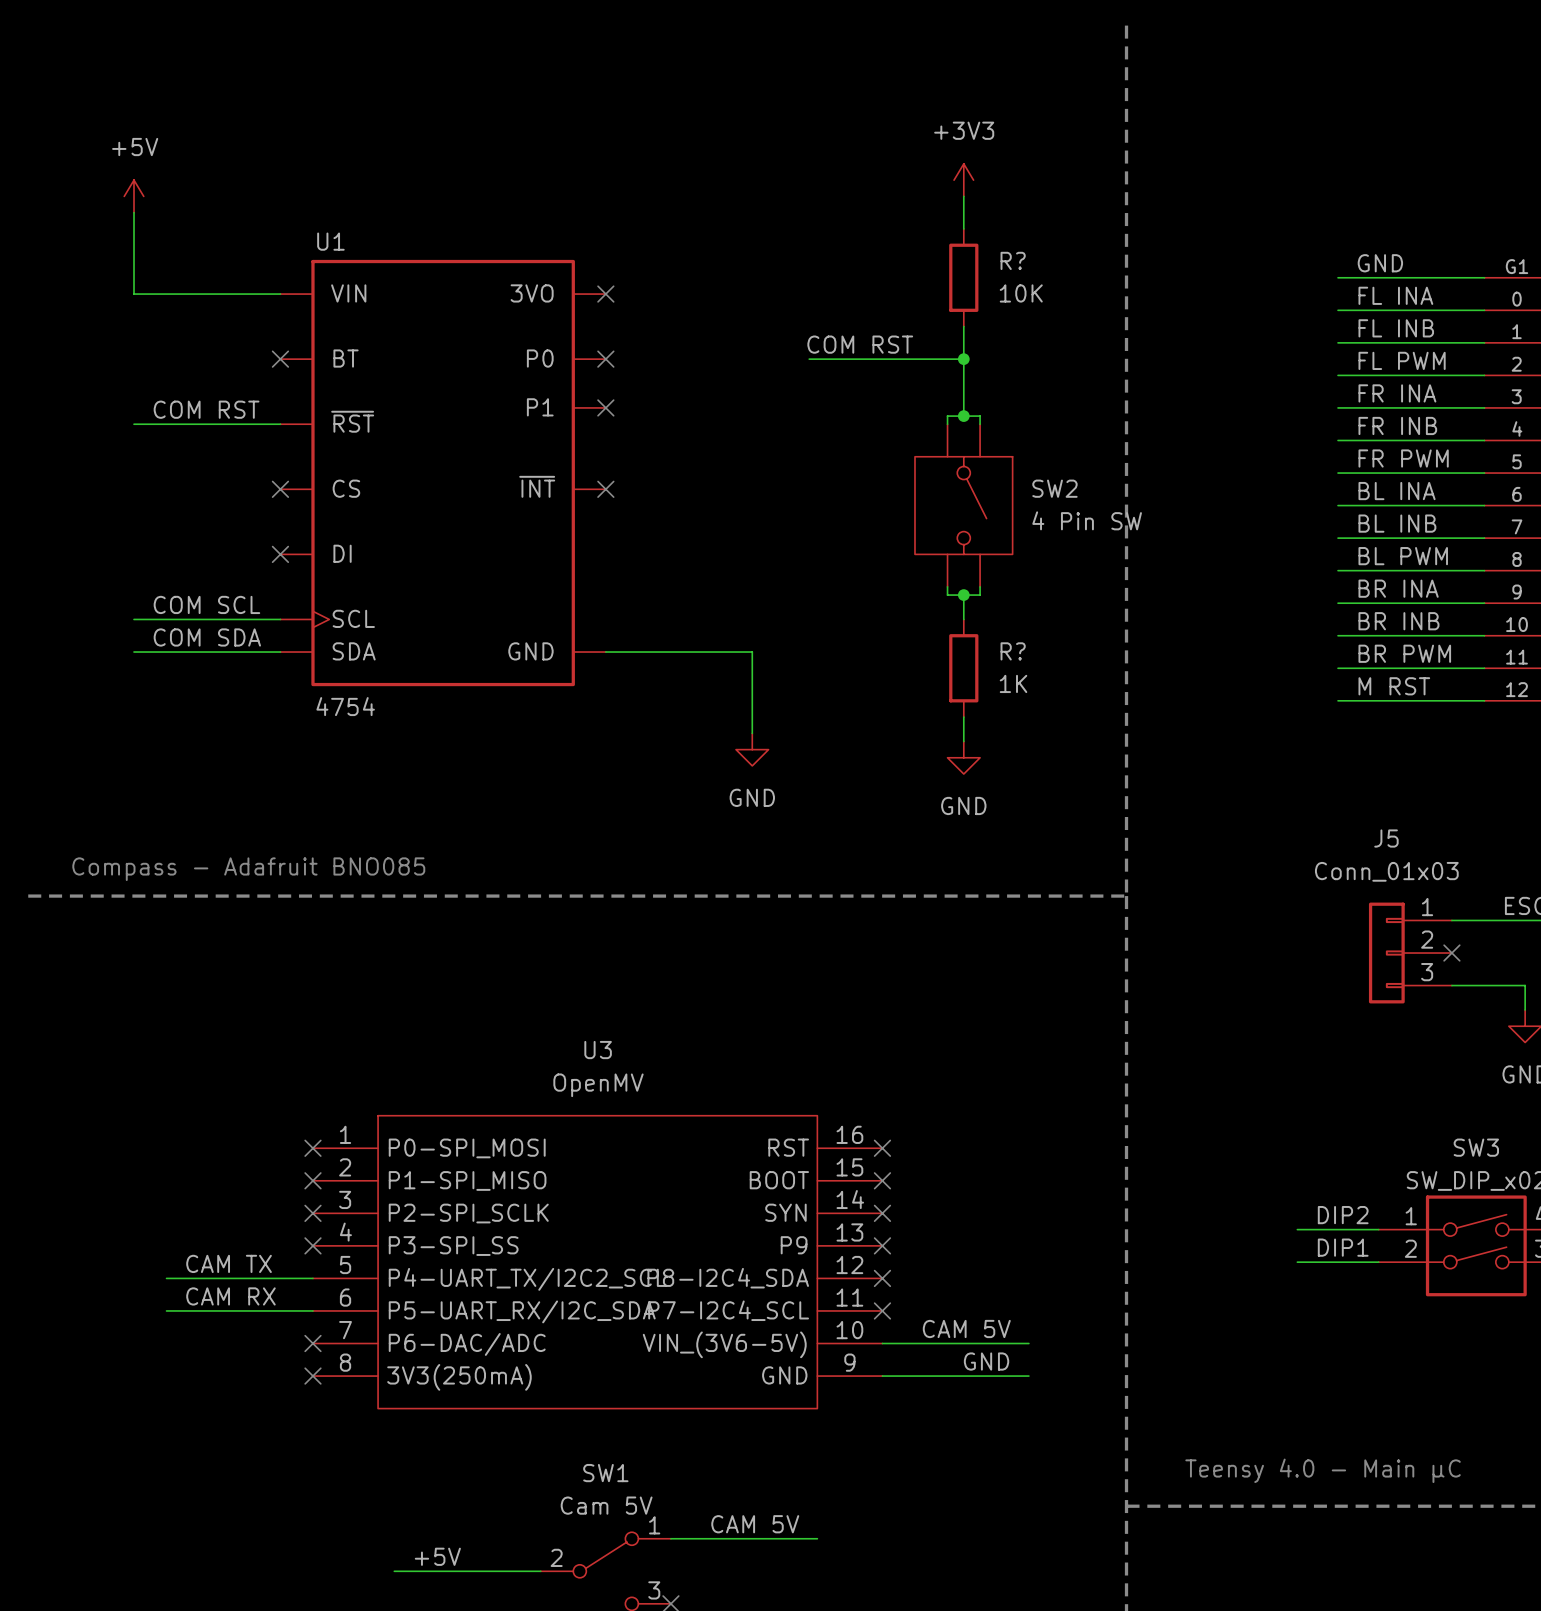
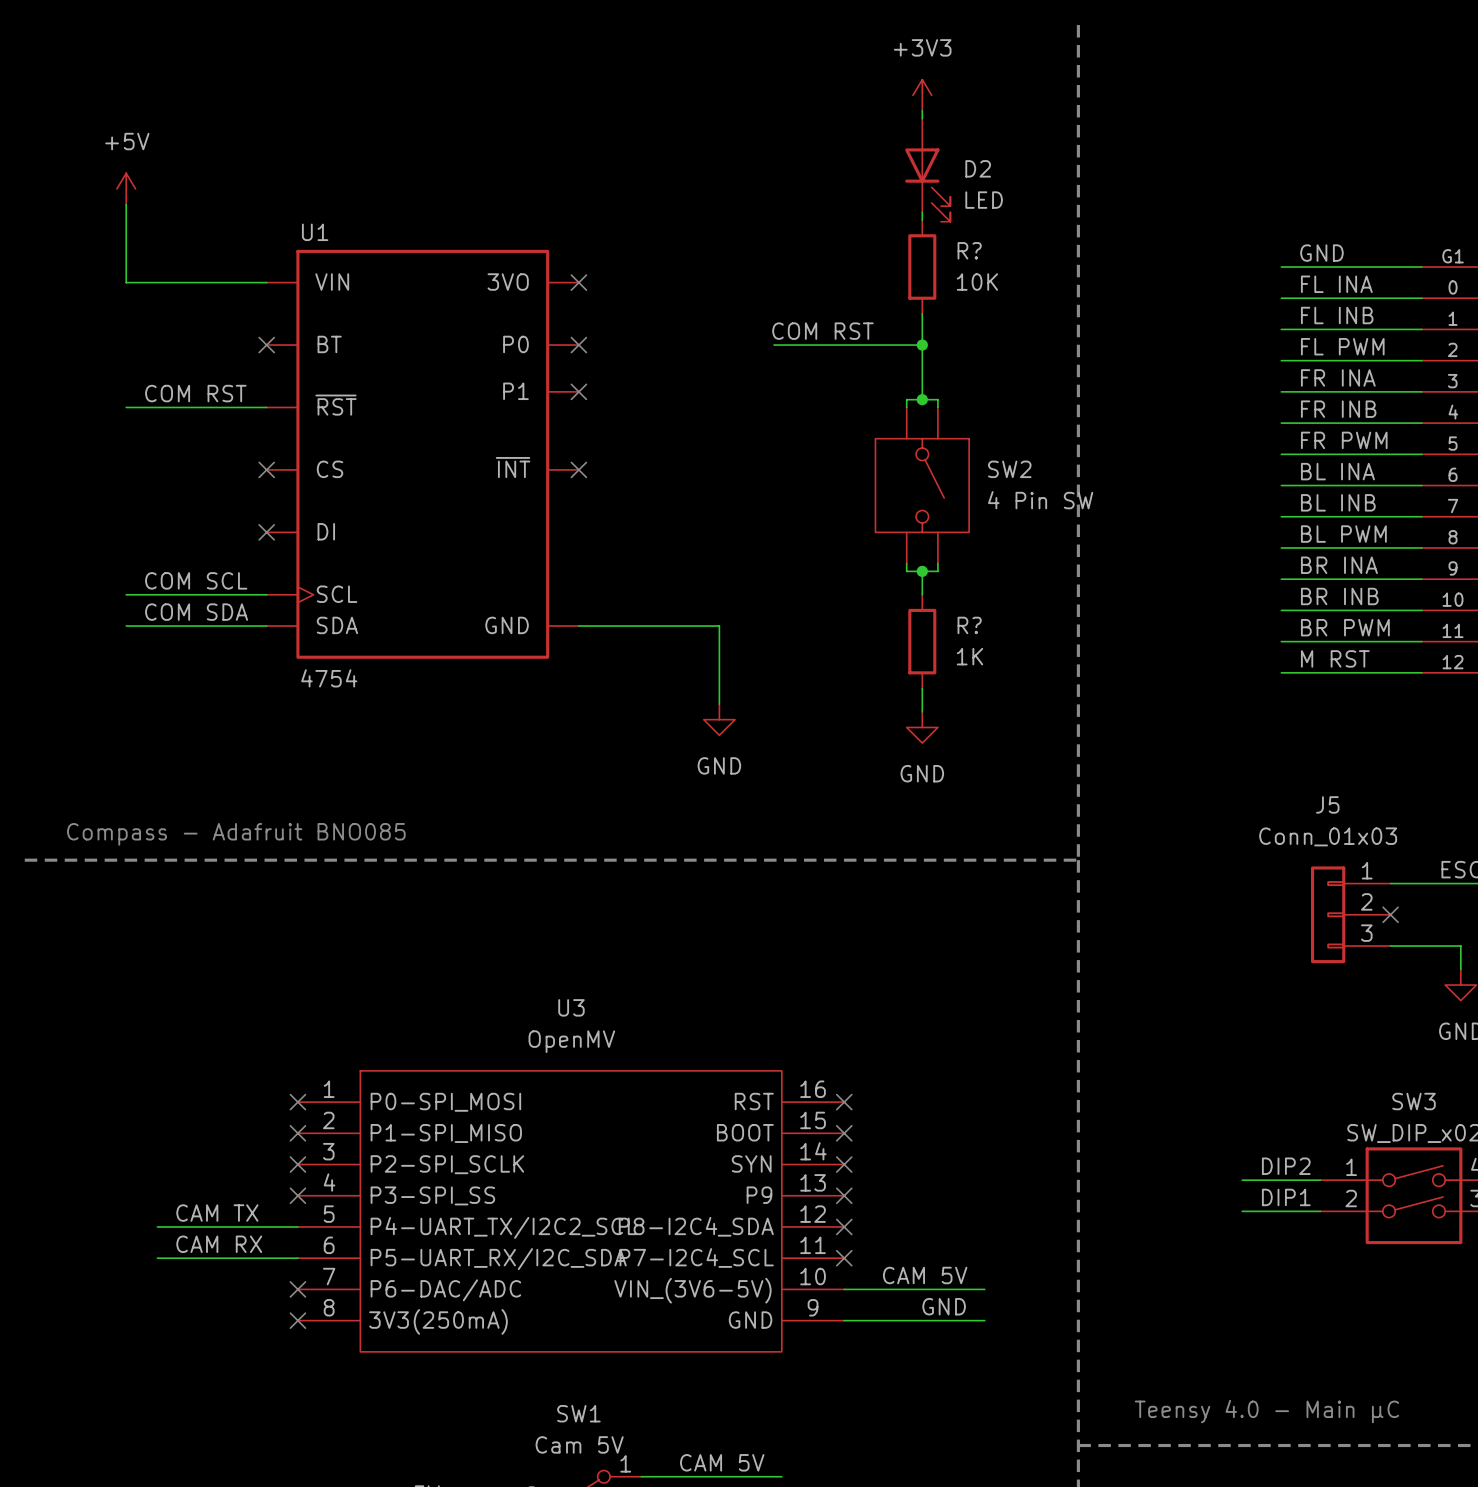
wire: none -> (922, 110) (922, 118)
D2: none -> LED (927, 170)
power symbol position: +3V3 (963, 180) -> +3V3 (922, 95)

